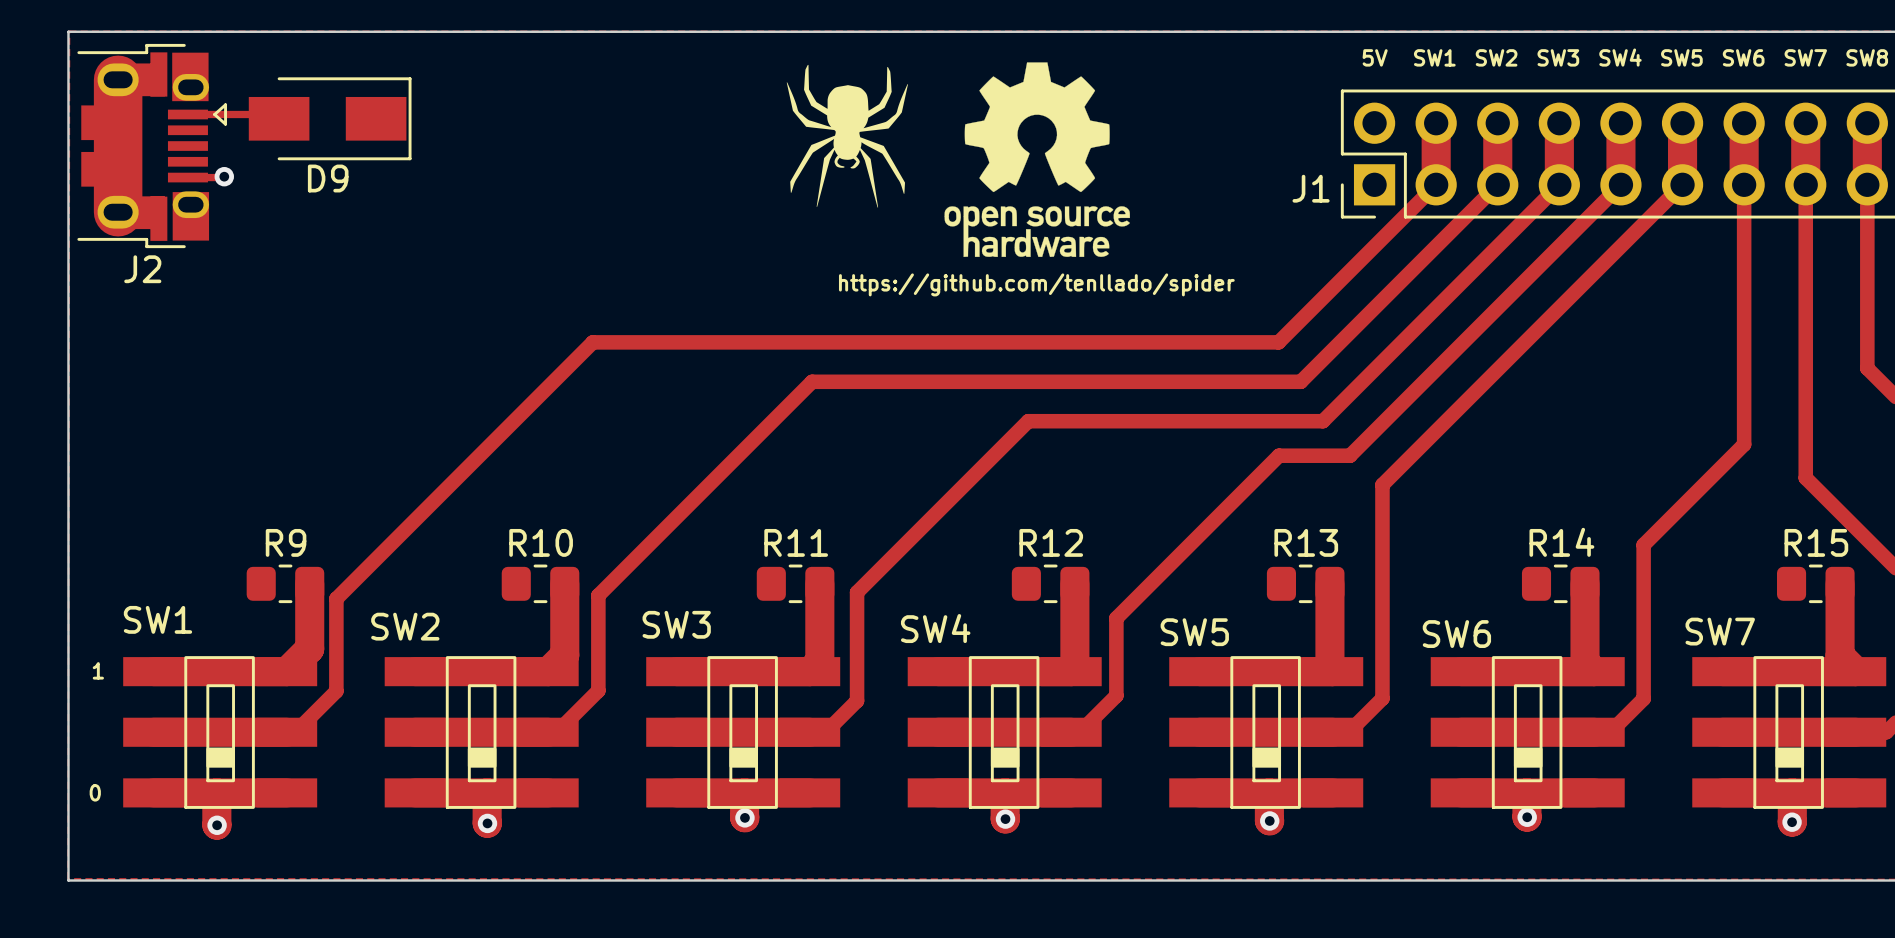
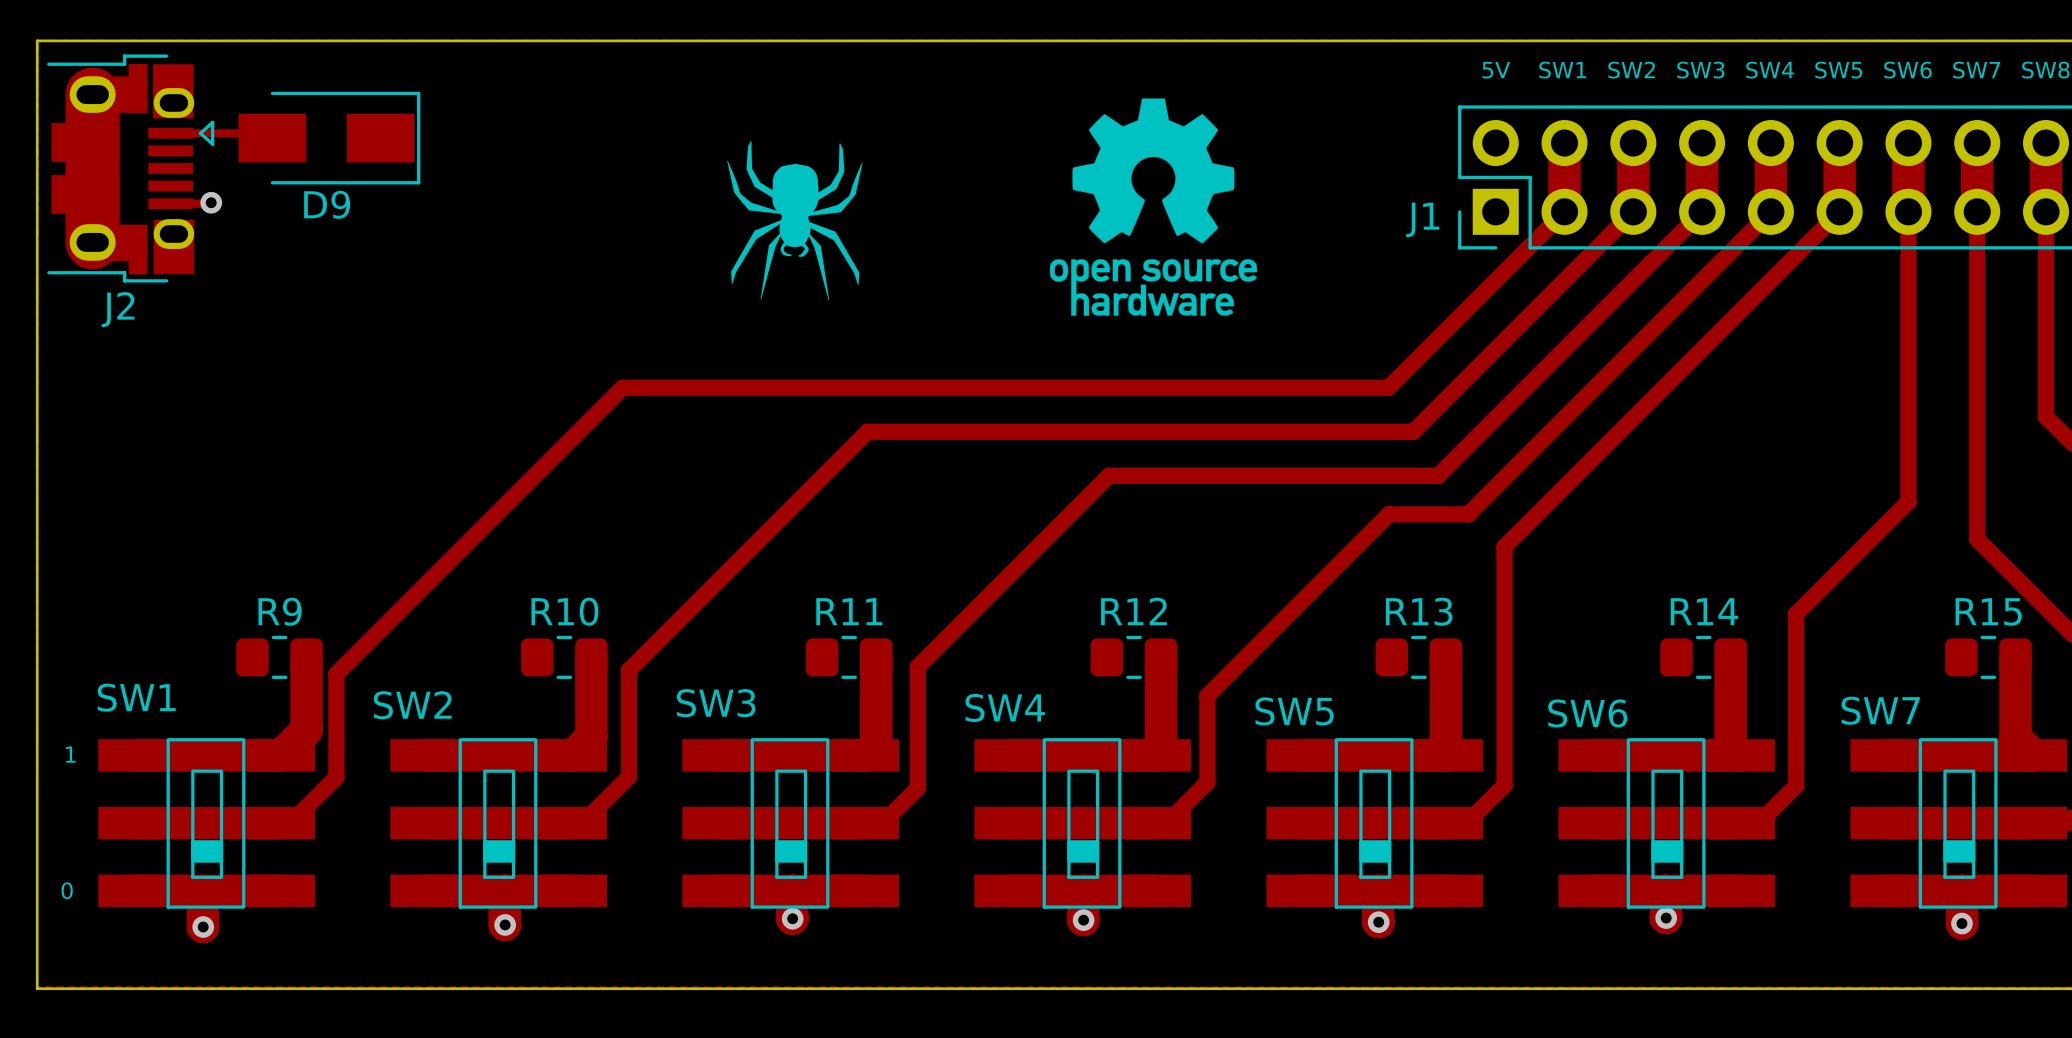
drawing position: (847, 136) -> (794, 220)
drawing position: (1037, 159) -> (1153, 207)
text: https://github.com/tenllado/spider (1036, 284) -> none

